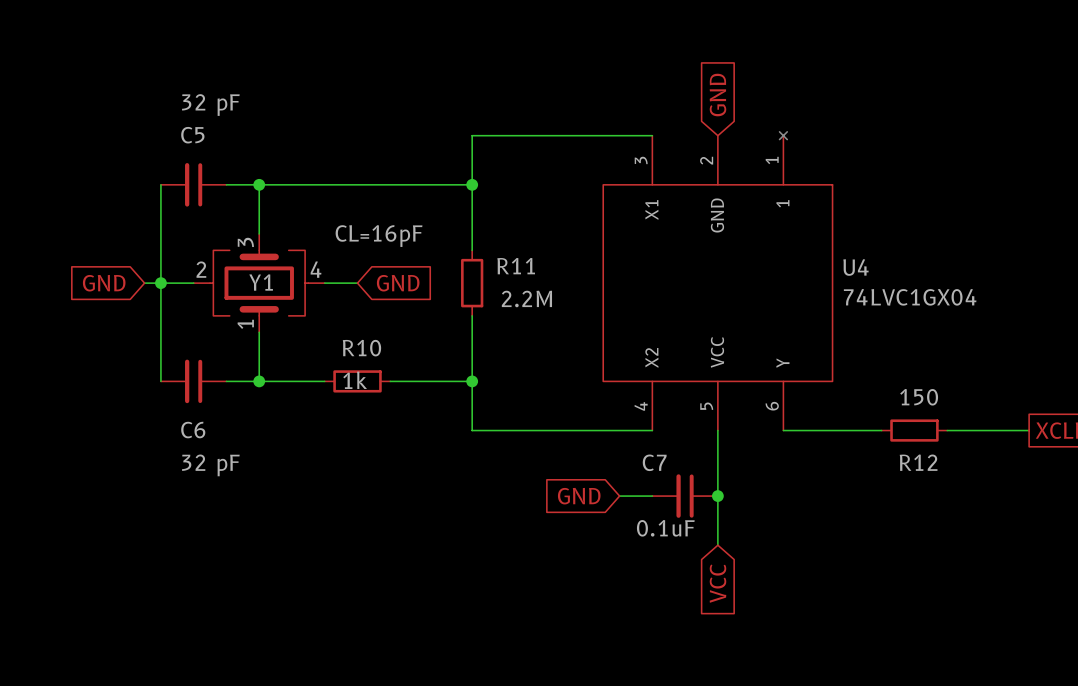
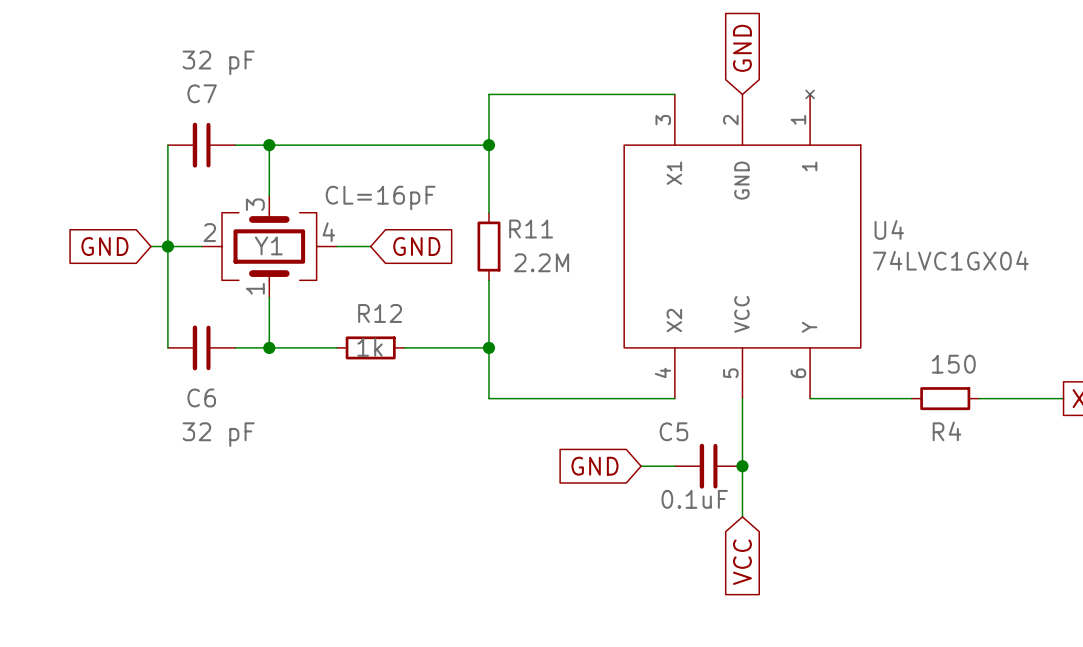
C5 name: C5 (192, 135) -> C7 (202, 93)
R10 name: R10 (361, 348) -> R12 (380, 313)
C7 name: C7 (654, 462) -> C5 (673, 431)
R12 name: R12 (918, 462) -> R4 (946, 431)

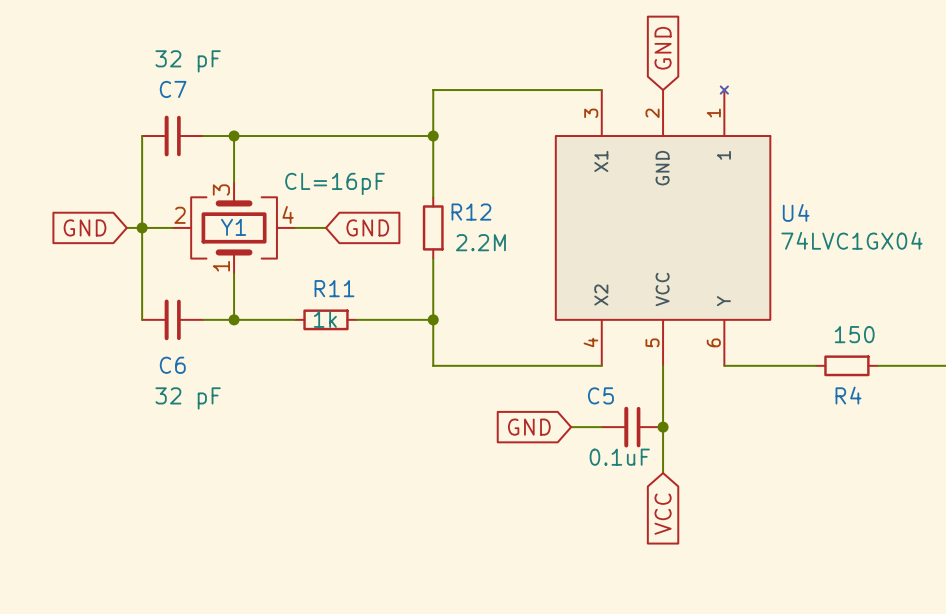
R11 name: R11 (531, 229) -> R12 (471, 212)
R12 name: R12 (380, 313) -> R11 (334, 288)

